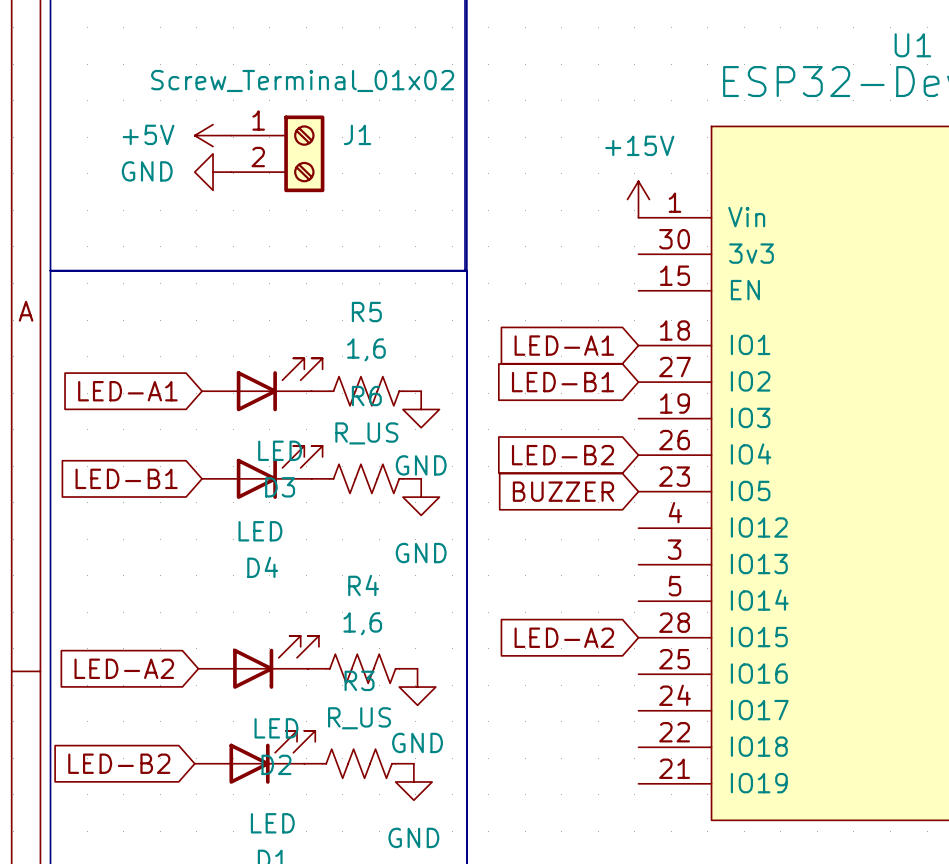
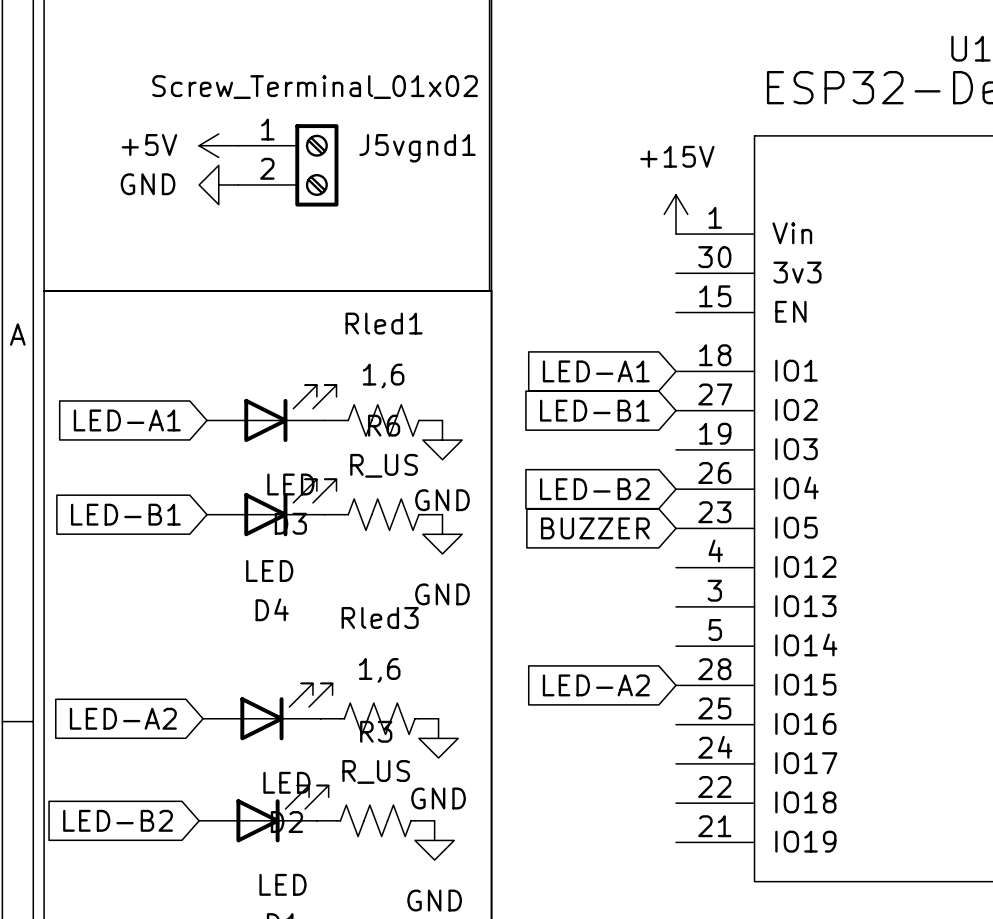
J1 name: J1 (357, 134) -> J5vgnd1 (417, 148)
R5 name: R5 (366, 312) -> Rled1 (384, 323)
R4 name: R4 (363, 585) -> Rled3 (380, 617)

